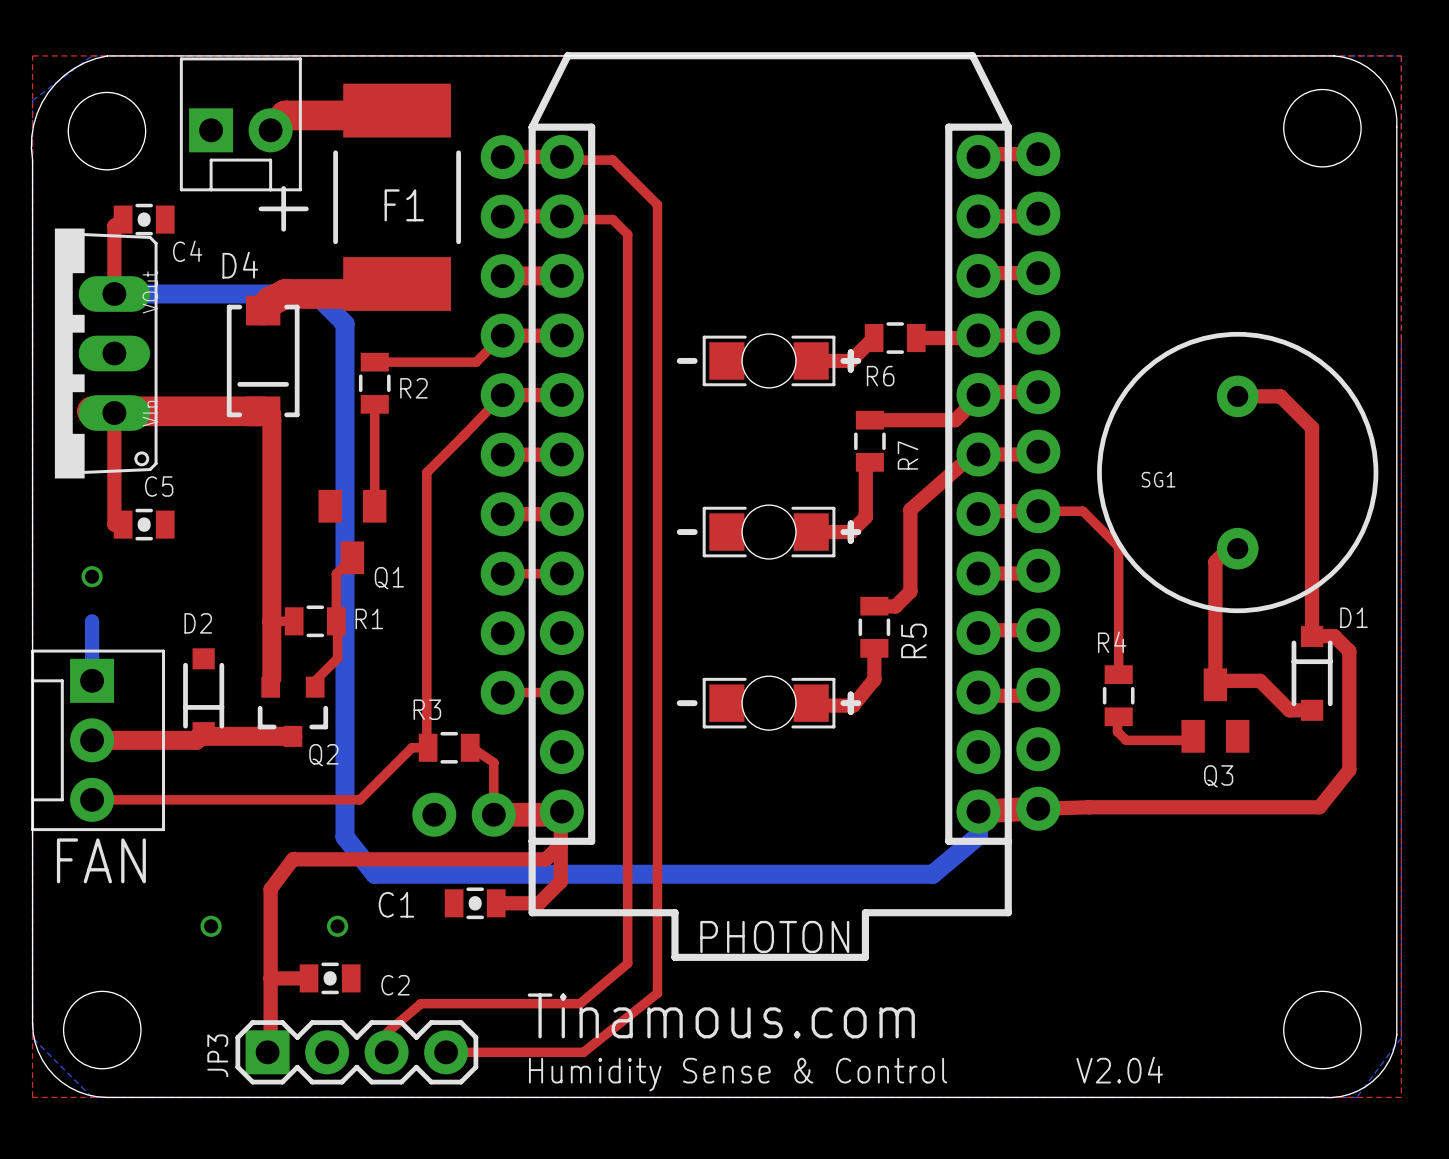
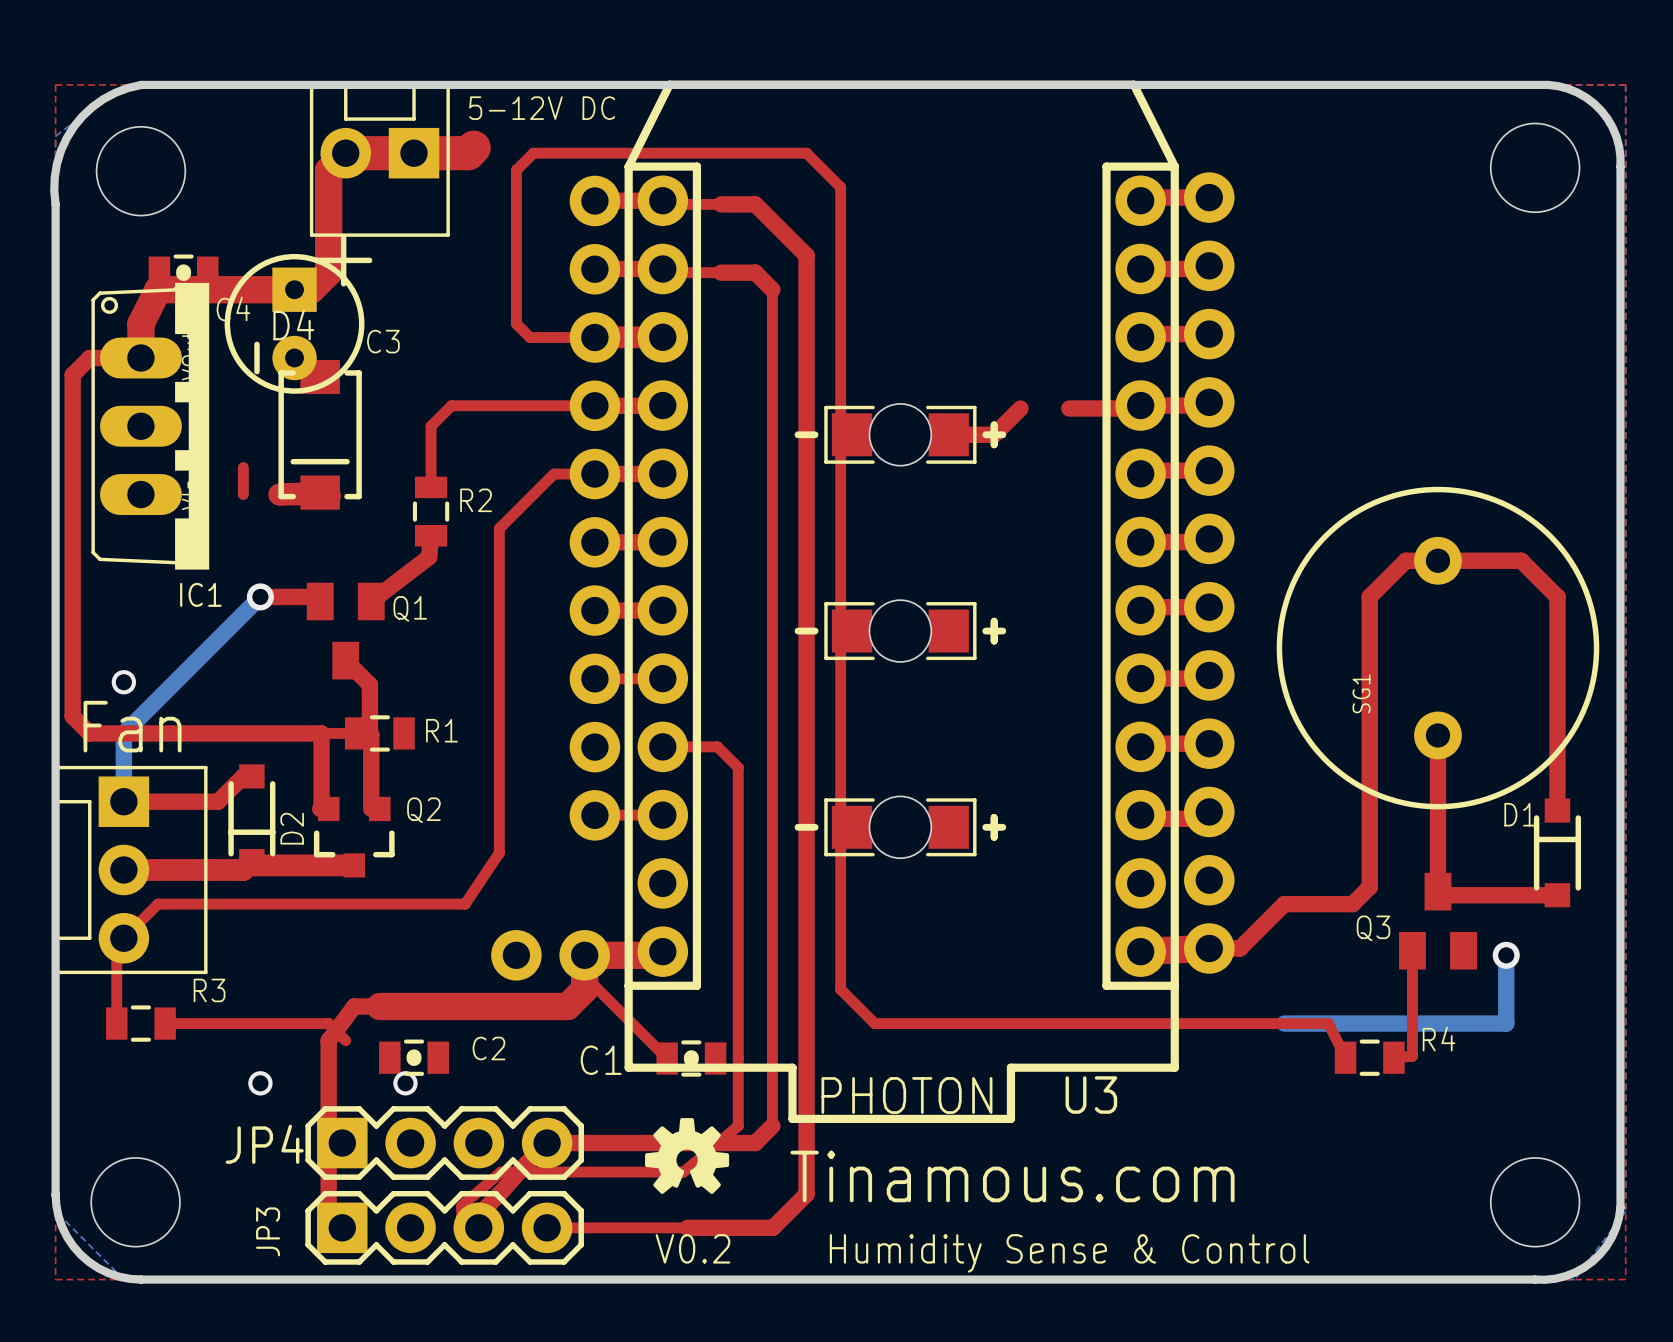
text: none -> 5-12V DC (542, 108)
part rotation: 0° (240, 124) -> 180° (379, 160)
top track: none -> (328, 170) (328, 272) (311, 289) (158, 289) (140, 323) (140, 357) (89, 357) (72, 375) (72, 716) (89, 733) (321, 733) (320, 808)
top track: (612, 160) (657, 204) (657, 234) -> (721, 272) (755, 272) (772, 289)
top track: none -> (721, 204) (755, 204) (806, 255) (806, 1194) (772, 1227) (687, 1227)
F1: (397, 197) -> none
top track: (123, 219) (114, 225) (114, 293) -> none
top track: (612, 219) (627, 234) (627, 651) -> (662, 746) (717, 746) (738, 767)
C3: none -> (294, 323)
top track: none -> (594, 337) (530, 337) (516, 323) (516, 170) (533, 153) (806, 153) (840, 187) (840, 989) (874, 1023) (1328, 1023) (1345, 1057)
top track: (397, 283) (387, 293) (285, 293) (270, 301) (263, 310) -> none
bottom track: (114, 293) (315, 293) (345, 323) (345, 837) (374, 874) (932, 874) (978, 835) (978, 811) -> none
top track: (502, 335) (476, 362) (374, 362) -> (594, 405) (451, 405) (431, 426) (431, 487)
R6: (895, 338) -> none
part: (106, 353) -> none
IC1: none -> (150, 426)
R2 position: (374, 383) -> (431, 511)
R2 name position: R2 (413, 388) -> R2 (476, 500)
top track: none -> (243, 467) (243, 494)
top track: (978, 394) (955, 420) (869, 420) -> none
top track: (502, 395) (426, 472) (428, 747) (411, 747) (359, 799) (92, 799) -> (594, 474) (553, 474) (499, 528) (499, 852) (465, 904) (158, 904) (116, 945) (116, 1023)
top track: (1237, 396) (1280, 396) (1312, 427) (1312, 636) -> none
top track: (374, 404) (374, 506) -> none
R7: (869, 441) -> none
top track: none -> (431, 535) (429, 557) (371, 601)
top track: (978, 454) (973, 454) (910, 509) (910, 591) (895, 606) (874, 606) -> none
top track: (869, 462) (865, 466) (865, 517) (850, 532) (811, 532) -> none
SG1 position: (1237, 472) -> (1437, 648)
SG1 name rotation: 0° (1158, 479) -> 90° counterclockwise (1361, 693)
bottom track: none -> (260, 596) (123, 733)
top track: none -> (260, 596) (315, 596) (320, 601)
via: none -> (260, 596)
top track: (1038, 511) (1082, 511) (1118, 546) (1118, 674) -> none
top track: (123, 524) (114, 524) (114, 413) (92, 411) (263, 411) (271, 419) (271, 678) -> none
C5: (144, 524) -> none
Q1 position: (352, 532) -> (345, 631)
top track: (1237, 548) (1228, 548) (1215, 561) (1215, 684) (1219, 680) (1260, 680) (1289, 710) (1312, 710) -> none
top track: none -> (345, 660) (369, 684) (371, 808)
top track: (352, 557) (336, 573) (337, 658) (315, 680) (315, 687) -> none
Q1 name position: Q1 (389, 578) -> Q1 (410, 608)
text: none -> Fan (132, 726)
D1 name position: D1 (1354, 617) -> D1 (1520, 814)
D2 name rotation: 0° (198, 623) -> 90° counterclockwise (292, 828)
D2 name position: D2 (198, 623) -> D2 (292, 828)
top track: none -> (1437, 735) (1437, 891) (1441, 895) (1557, 895)
R5: (874, 627) -> none
top track: (1312, 636) (1334, 636) (1349, 651) (1349, 770) (1319, 807) (1038, 808) -> (1557, 810) (1557, 596) (1521, 560) (1405, 560) (1369, 596) (1369, 887) (1352, 904) (1284, 904) (1240, 948) (1209, 948)
top track: (874, 648) (874, 679) (853, 705) (813, 705) (811, 703) -> none
top track: none -> (243, 776) (218, 801) (123, 801)
D1 position: (1312, 673) -> (1557, 852)
R4 rotation: 0° (1118, 695) -> 90° clockwise (1369, 1057)
R4 position: (1118, 695) -> (1369, 1057)
R3 name position: R3 (427, 709) -> R3 (209, 990)
Q3 position: (1215, 710) -> (1437, 921)
top track: (1118, 716) (1117, 731) (1126, 740) (1189, 740) (1193, 736) -> none
R3 position: (449, 747) -> (140, 1023)
top track: (470, 747) (493, 762) (493, 814) (496, 817) -> none
Q2 name position: Q2 (323, 755) -> Q2 (423, 810)
Q3 name position: Q3 (1218, 776) -> Q3 (1373, 928)
top track: none -> (1412, 950) (1412, 1056) (1393, 1057)
top track: (561, 811) (560, 881) (539, 903) (496, 903) -> none
bottom track: none -> (1506, 955) (1506, 1023) (1284, 1023)
via: none -> (1506, 955)
top track: (560, 844) (545, 859) (478, 859) -> (667, 1058) (584, 976) (584, 955) (584, 989) (567, 1006)
top track width: thin (315, 859) (478, 859) -> thick (379, 1006) (567, 1006)
text: FAN (101, 860) -> none
top track: none -> (165, 1023) (328, 1023) (345, 1040)
C1 position: (475, 903) -> (691, 1058)
U3 name: none -> U3 (1091, 1095)
drawing: none -> [645, 1118, 730, 1194]
top track: (657, 963) (657, 993) (583, 1052) -> (772, 1125) (755, 1143) (547, 1143) (478, 1214) (478, 1227)
top track: (270, 978) (309, 978) -> none
C2 position: (330, 978) -> (414, 1057)
JP4: none -> (444, 1143)
C2 name position: C2 (395, 985) -> C2 (488, 1048)
text position: Tinamous.com (721, 1015) -> Tinamous.com (1012, 1176)
board edge width: thin (32, 1023) (33, 1032) (35, 1042) (38, 1051) (54, 1075) (78, 1091) (106, 1097) (1331, 1097) (1349, 1094) (1365, 1086) (1379, 1075) (1389, 1060) (1396, 1034) (1396, 118) (1393, 101) (1385, 85) (1367, 67) (1351, 59) (1334, 55) (107, 55) (95, 58) (74, 68) (64, 75) (48, 92) (37, 113) (31, 136) (32, 1024) -> thick (55, 1194) (56, 1205) (58, 1216) (62, 1226) (80, 1254) (108, 1273) (140, 1279) (1545, 1279) (1565, 1276) (1584, 1267) (1600, 1254) (1611, 1237) (1620, 1207) (1620, 156) (1616, 136) (1607, 118) (1586, 97) (1568, 88) (1548, 84) (141, 84) (128, 88) (103, 99) (92, 107) (73, 126) (60, 150) (54, 177) (55, 1195)
JP3 position: (356, 1052) -> (444, 1227)
text: none -> V0.2 (692, 1248)
text: V2.04 (1119, 1070) -> none
text position: Humidity Sense & Control (738, 1074) -> Humidity Sense & Control (1069, 1253)

